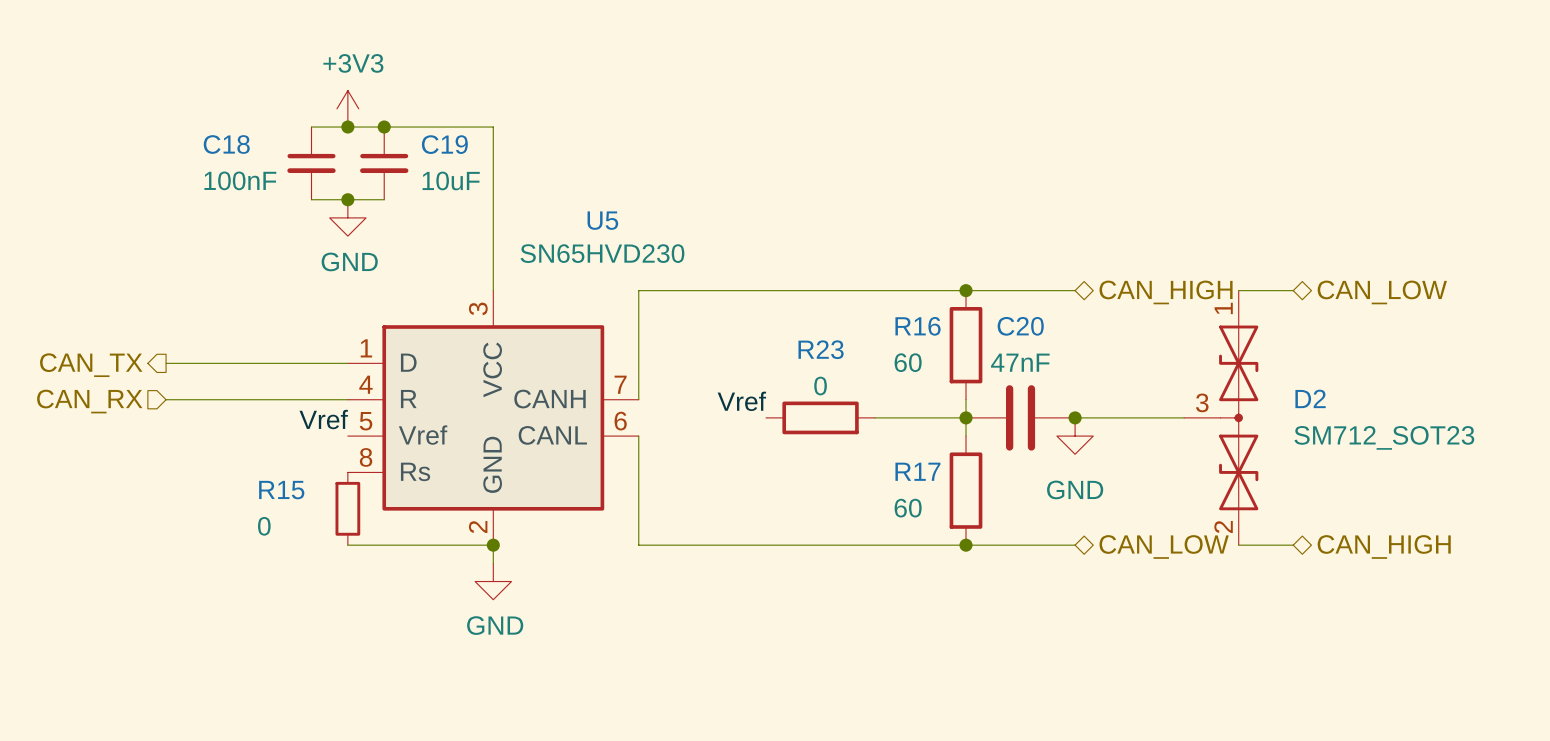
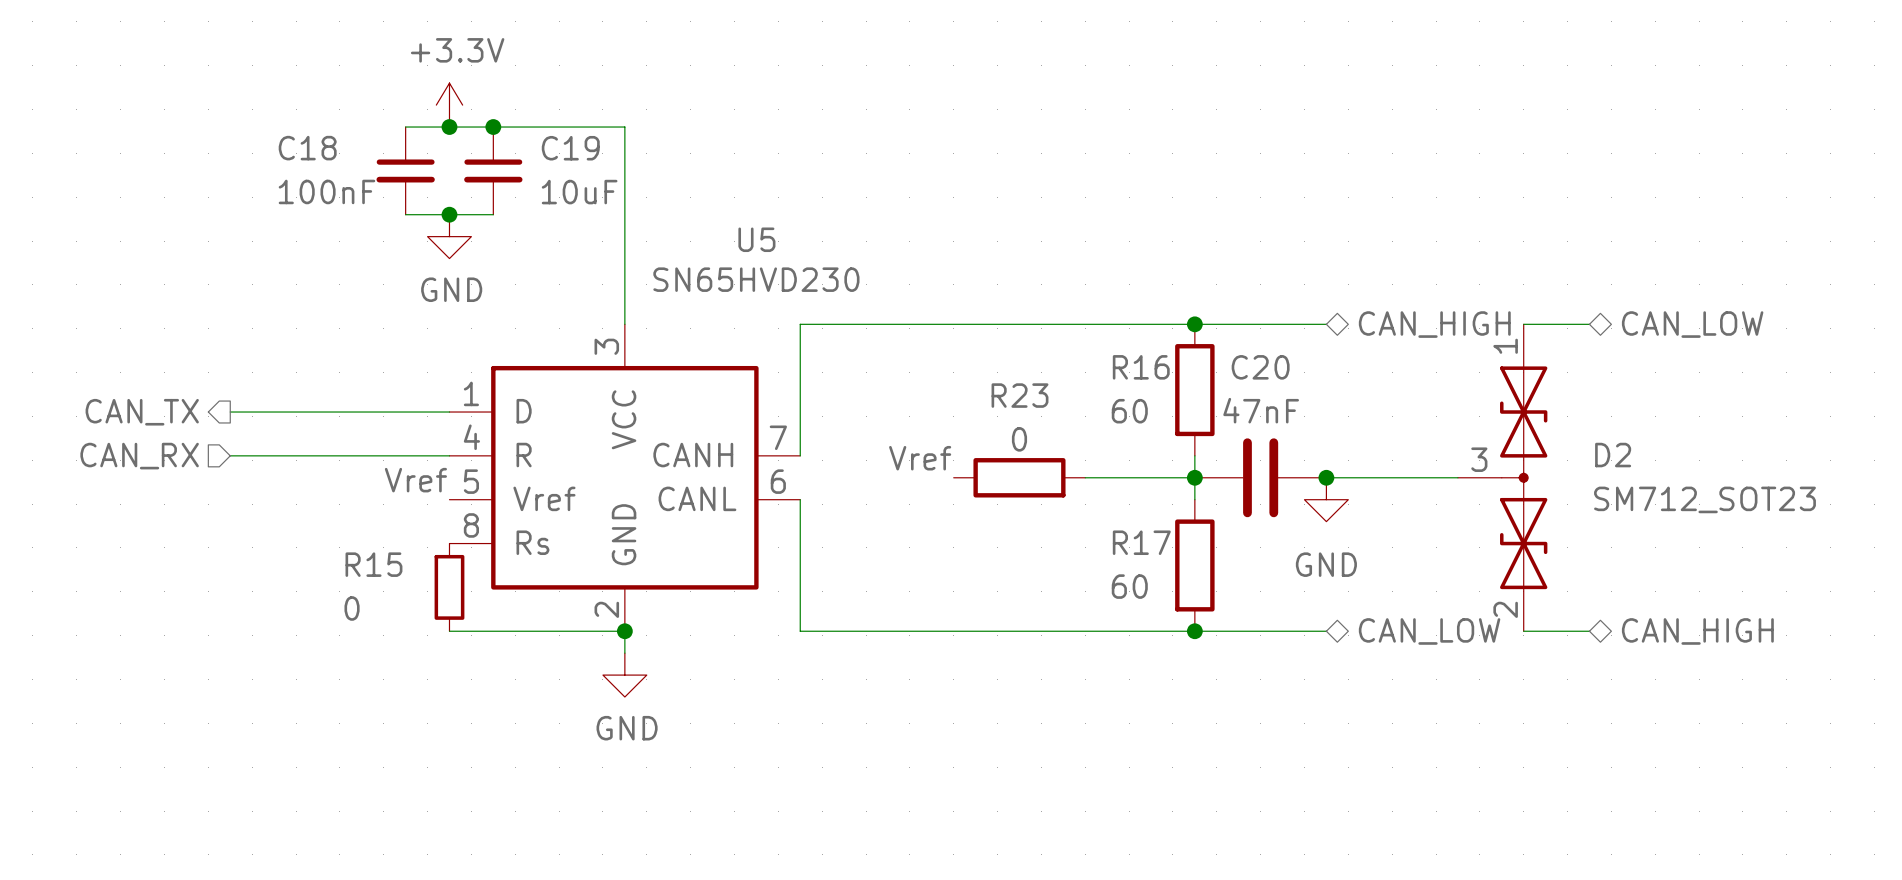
power symbol: +3V3 (347, 108) -> +3.3V (449, 105)

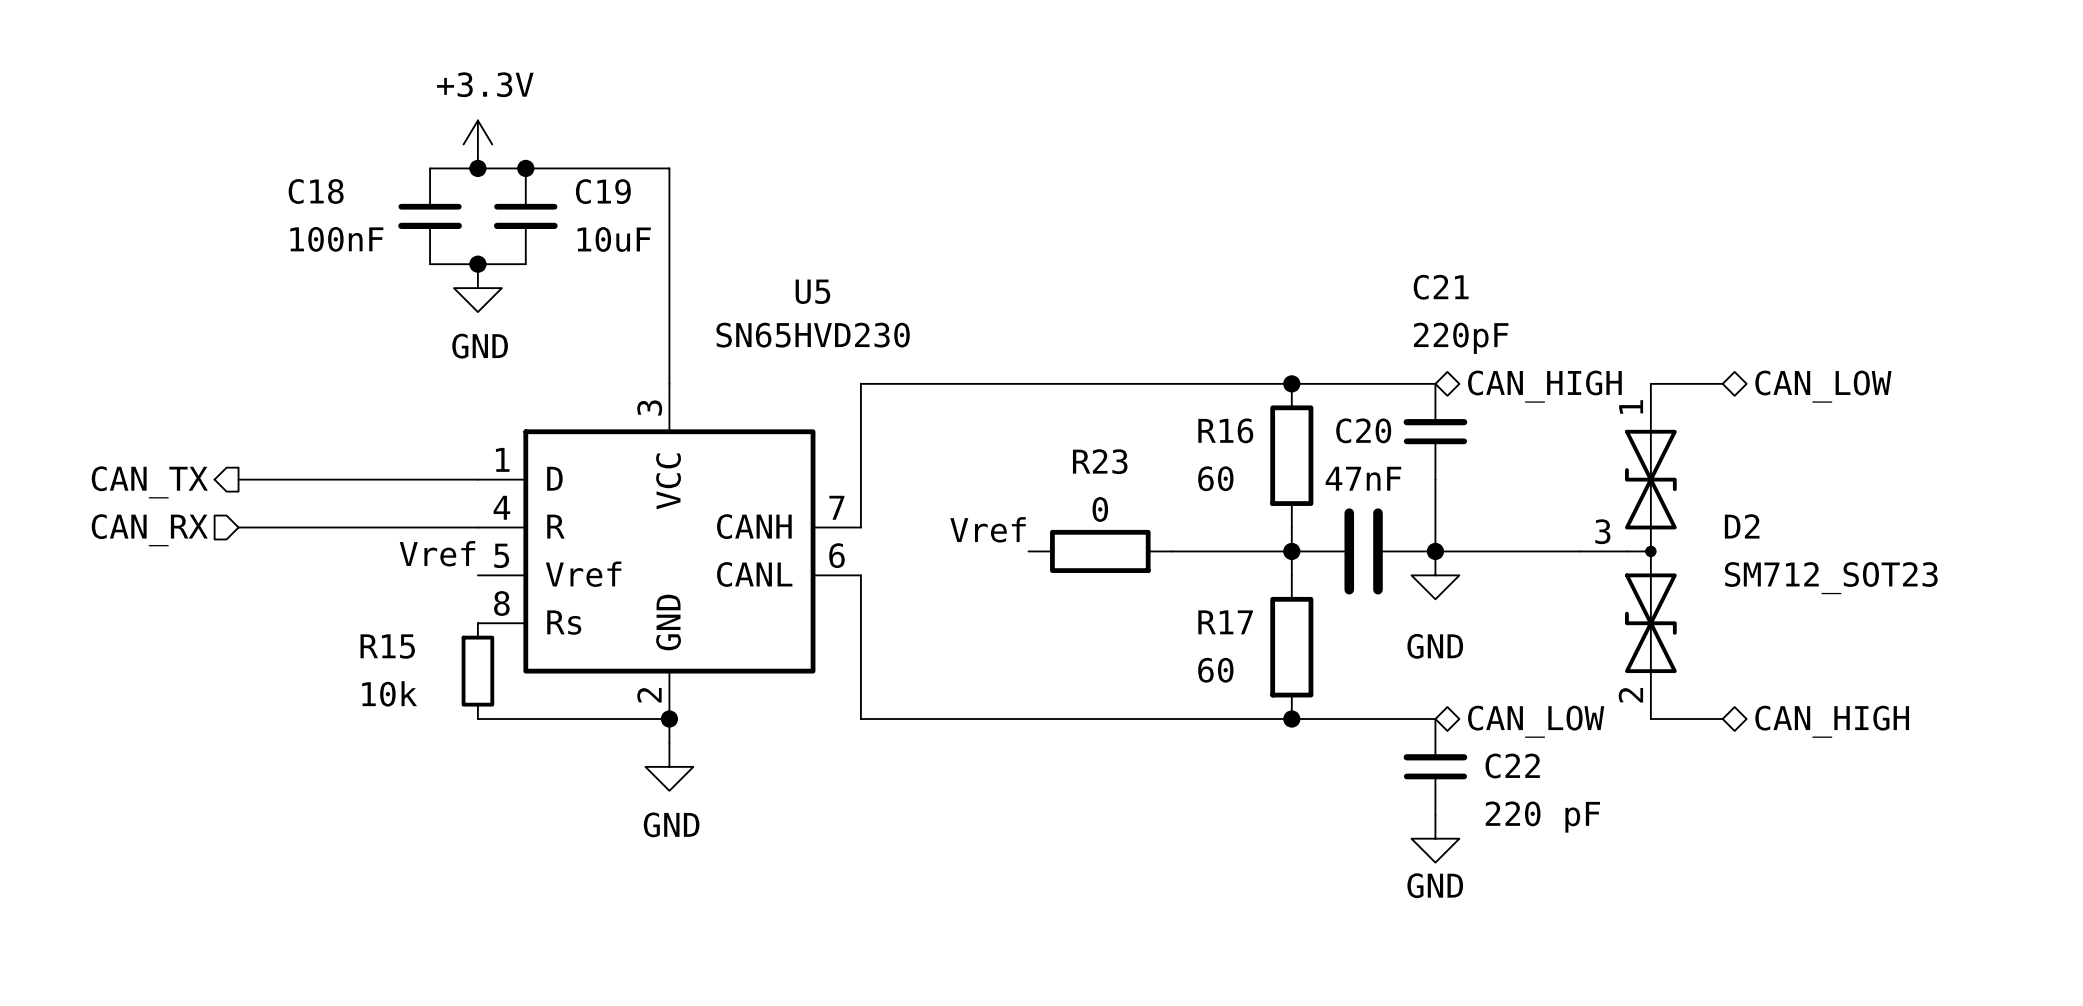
C21: none -> 220pF (1435, 431)
wire: none -> (1435, 479) (1435, 551)
R15 value: 0 (352, 608) -> 10k (389, 693)
C22: none -> 220 pF (1435, 766)
power symbol: none -> GND (1435, 838)

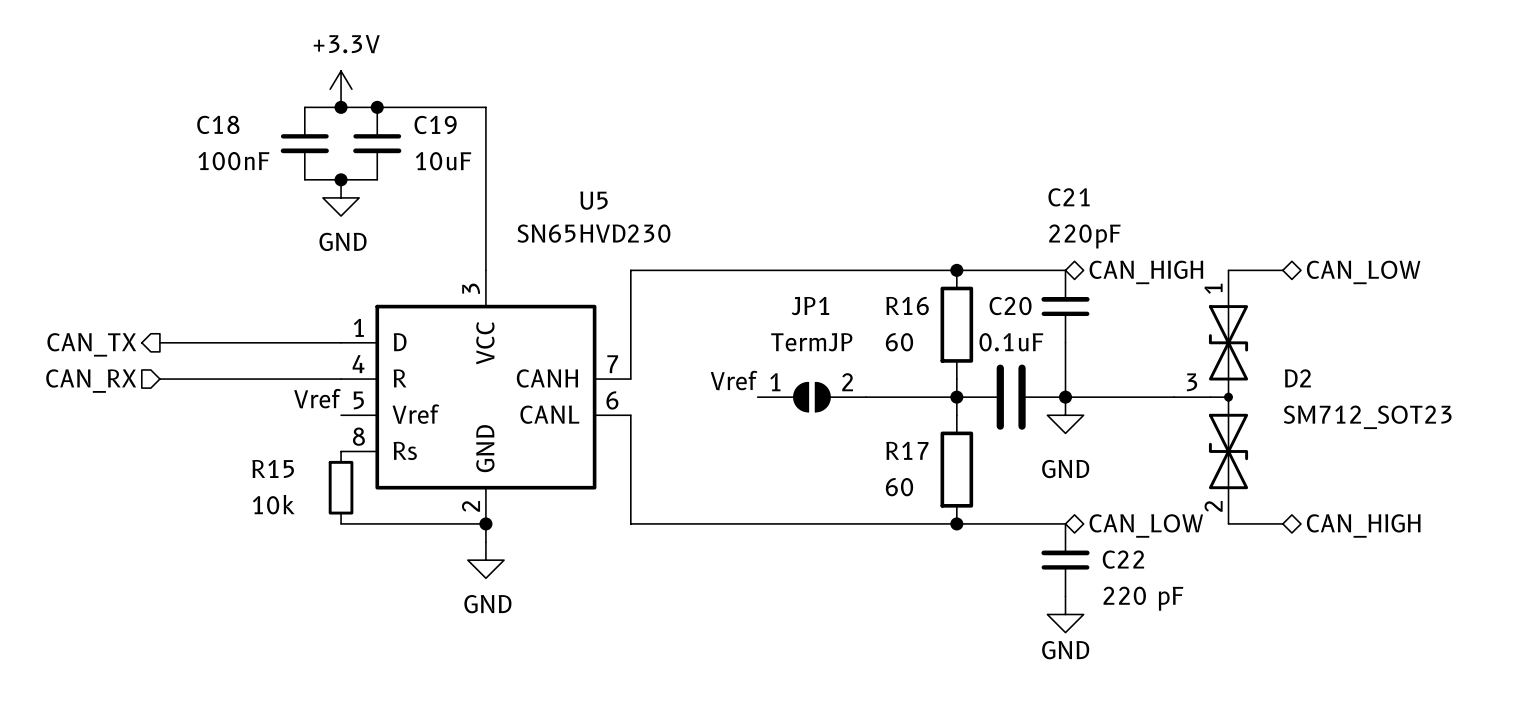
C20 value: 47nF (1363, 478) -> 0.1uF (1011, 342)
R23: 0 (1100, 551) -> none
JP1: none -> TermJP (811, 397)

